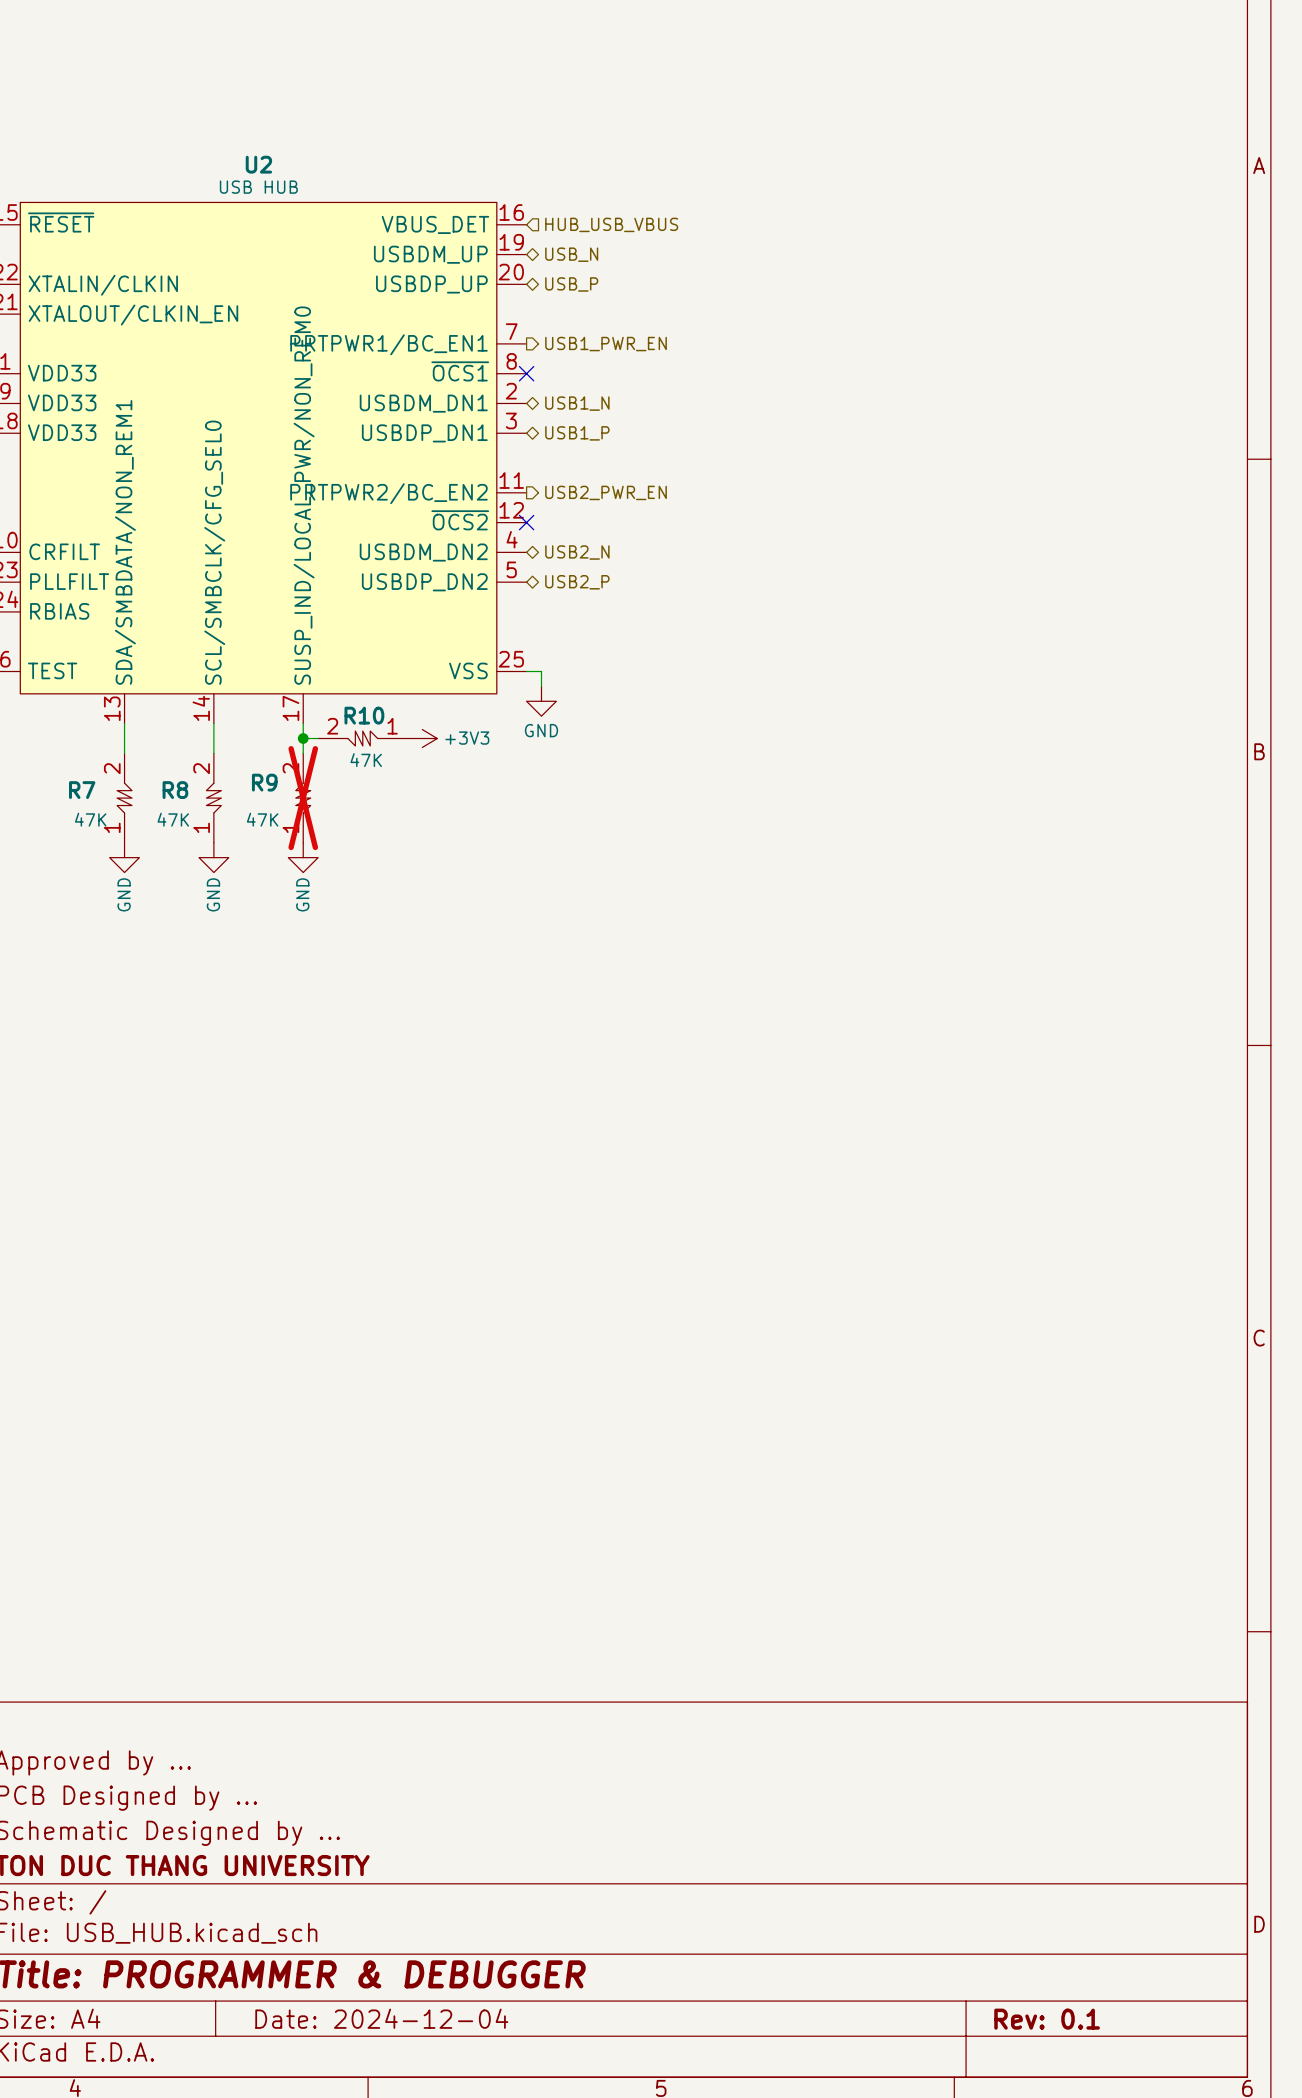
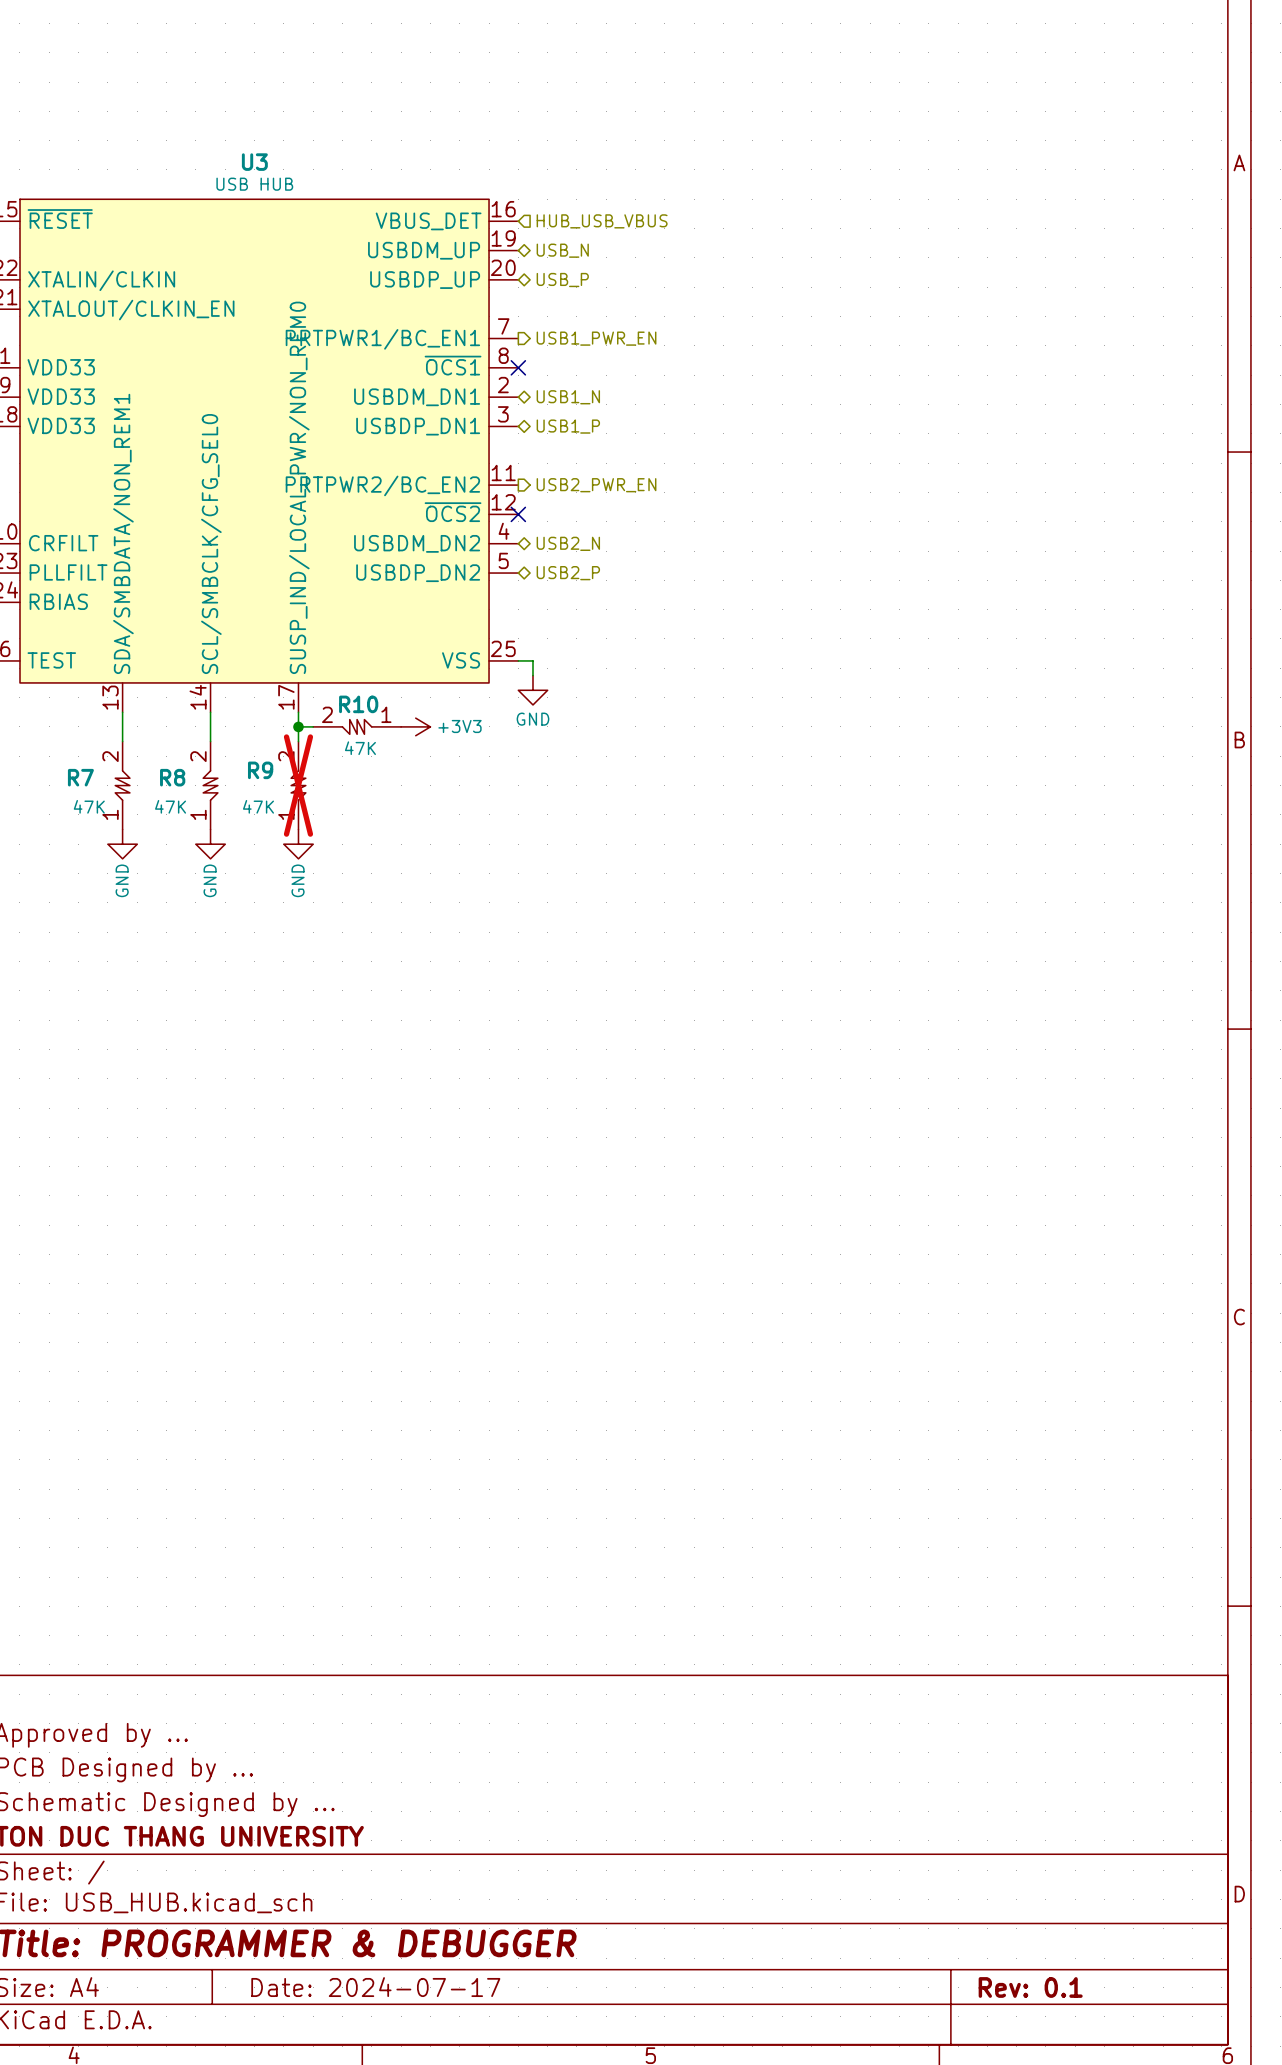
U2 name: U2 (258, 164) -> U3 (254, 162)
title block: Date: 2024-12-04 (381, 2018) -> Date: 2024-07-17 (375, 1987)

